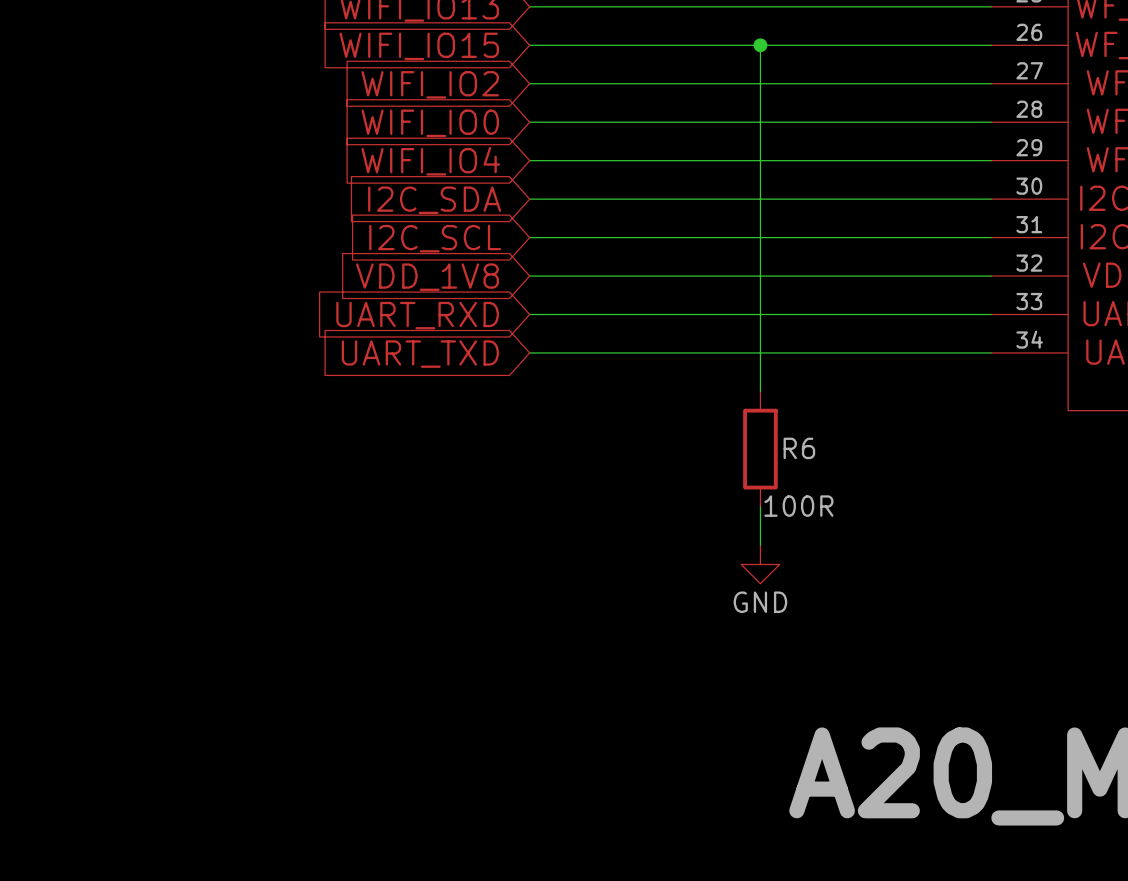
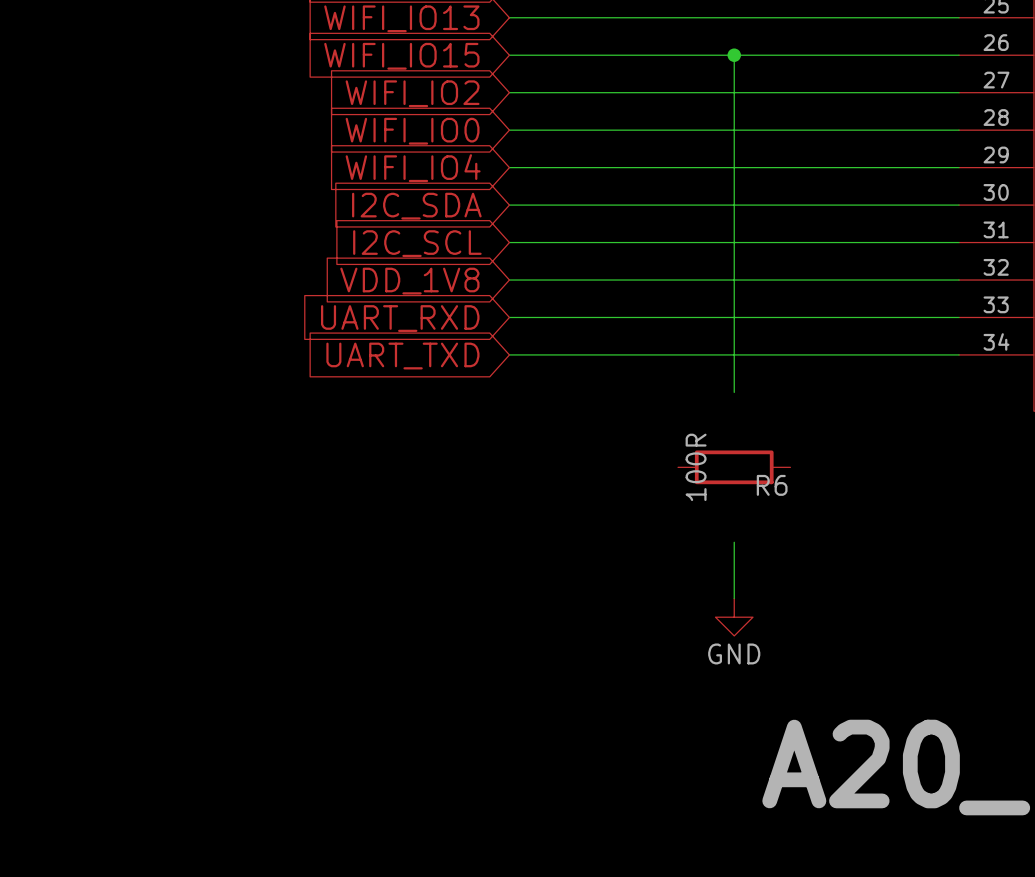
R6 rotation: 0° (760, 449) -> 90° clockwise (734, 467)
wire: (760, 506) (760, 545) -> (734, 598) (734, 542)
R6 value position: 100R (798, 506) -> 100R (696, 467)
power symbol position: GND (760, 564) -> GND (734, 617)

